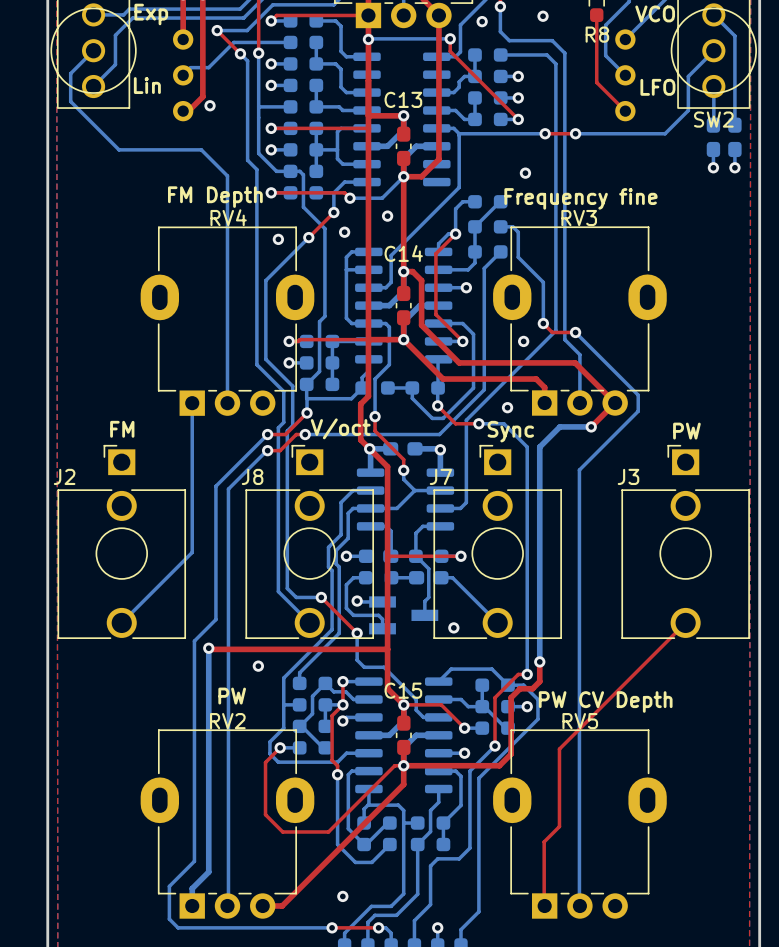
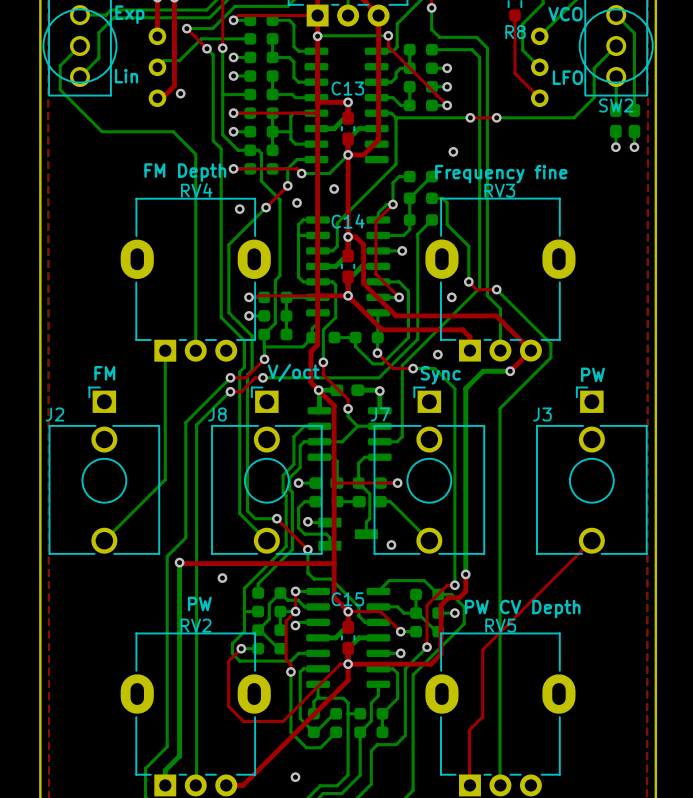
via: (543, 16) -> none
via: (482, 21) -> none

